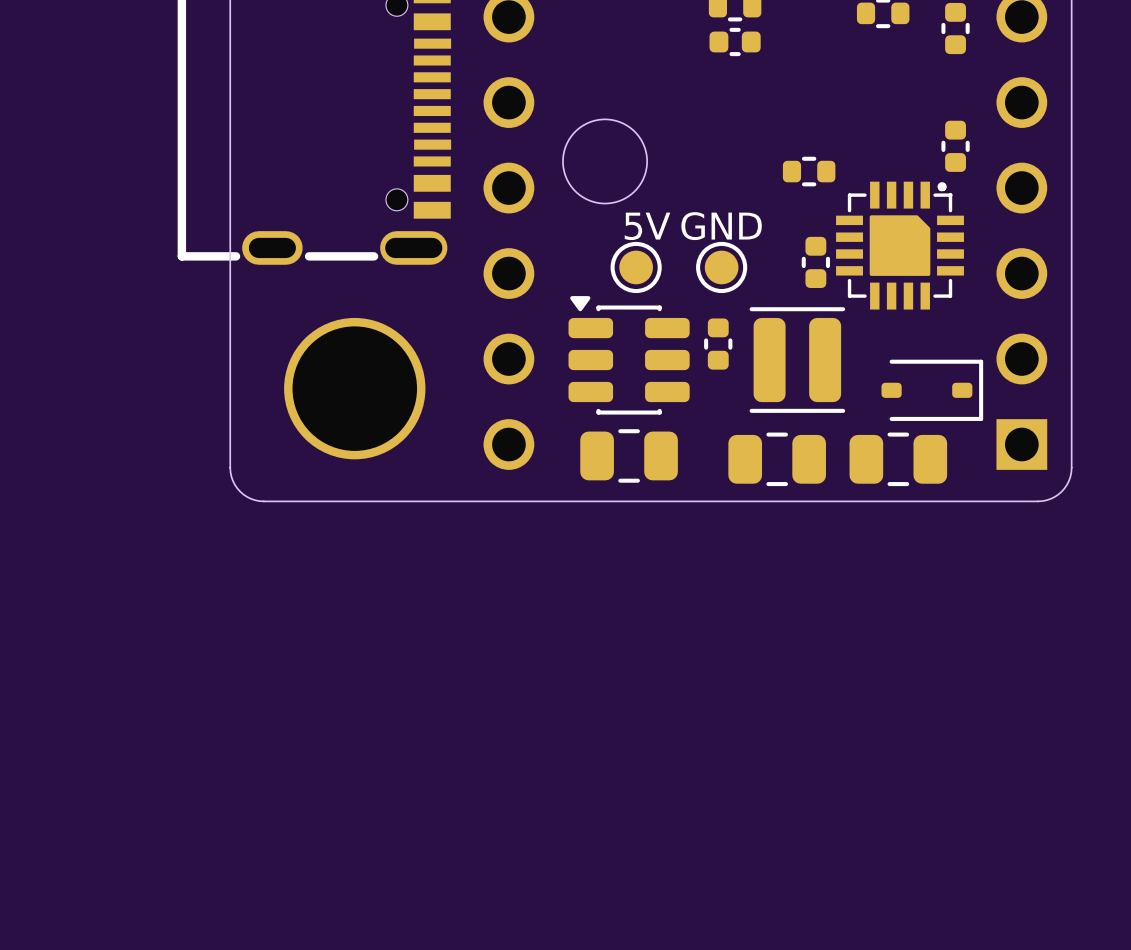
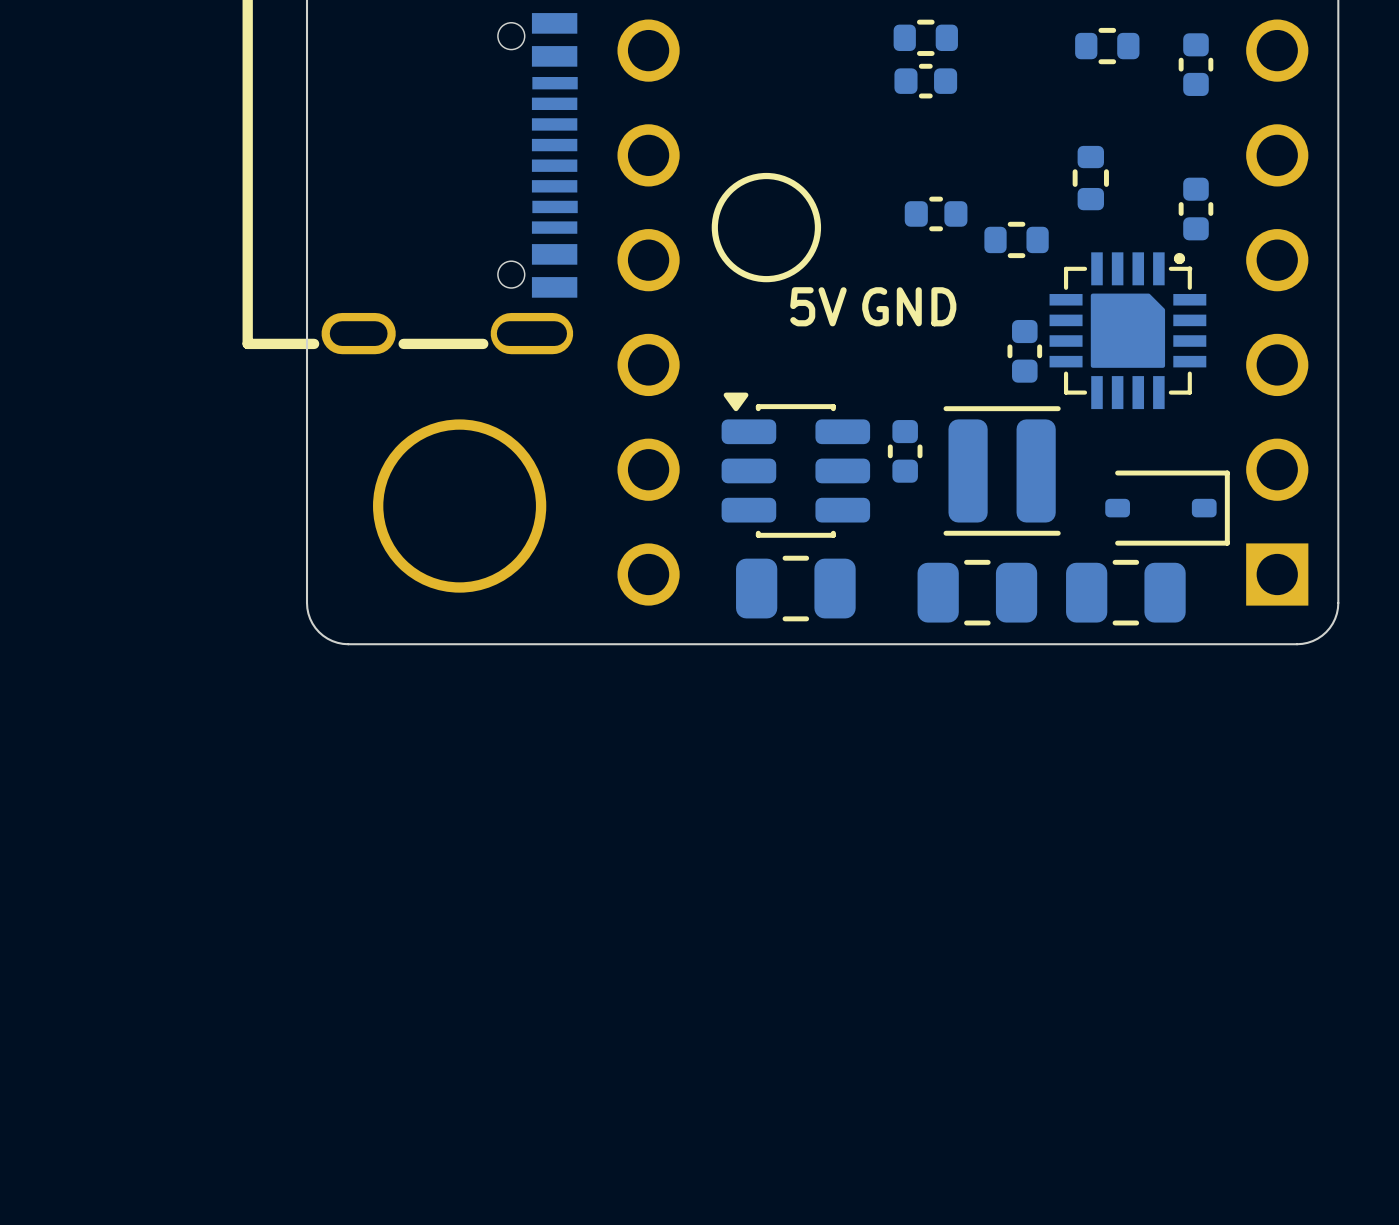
drawing: none -> [711, 172, 822, 283]
round board edge: [562, 118, 648, 205] -> none
part: none -> (1090, 178)
part: none -> (936, 213)
part: (636, 267) -> none
part: (721, 267) -> none

